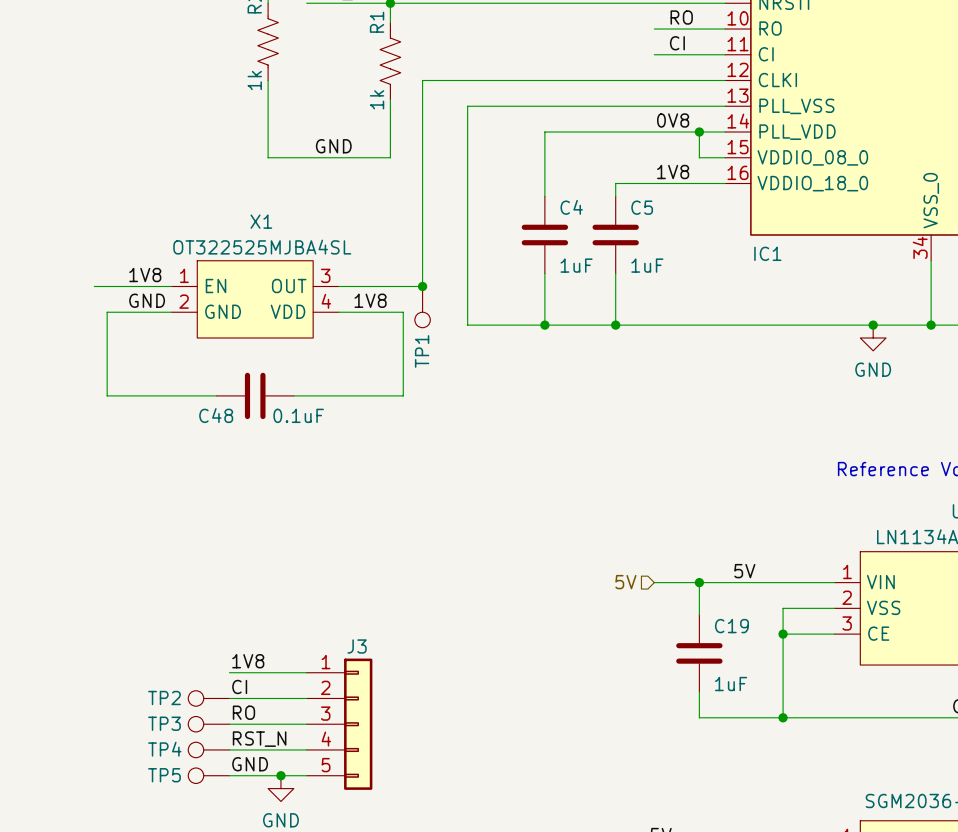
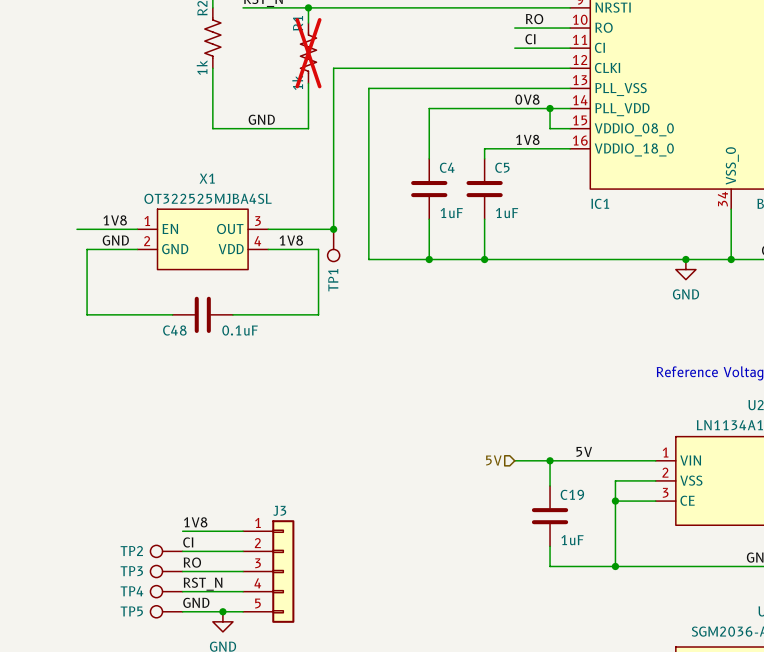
R1 do-not-place cross: none -> (308, 53)

